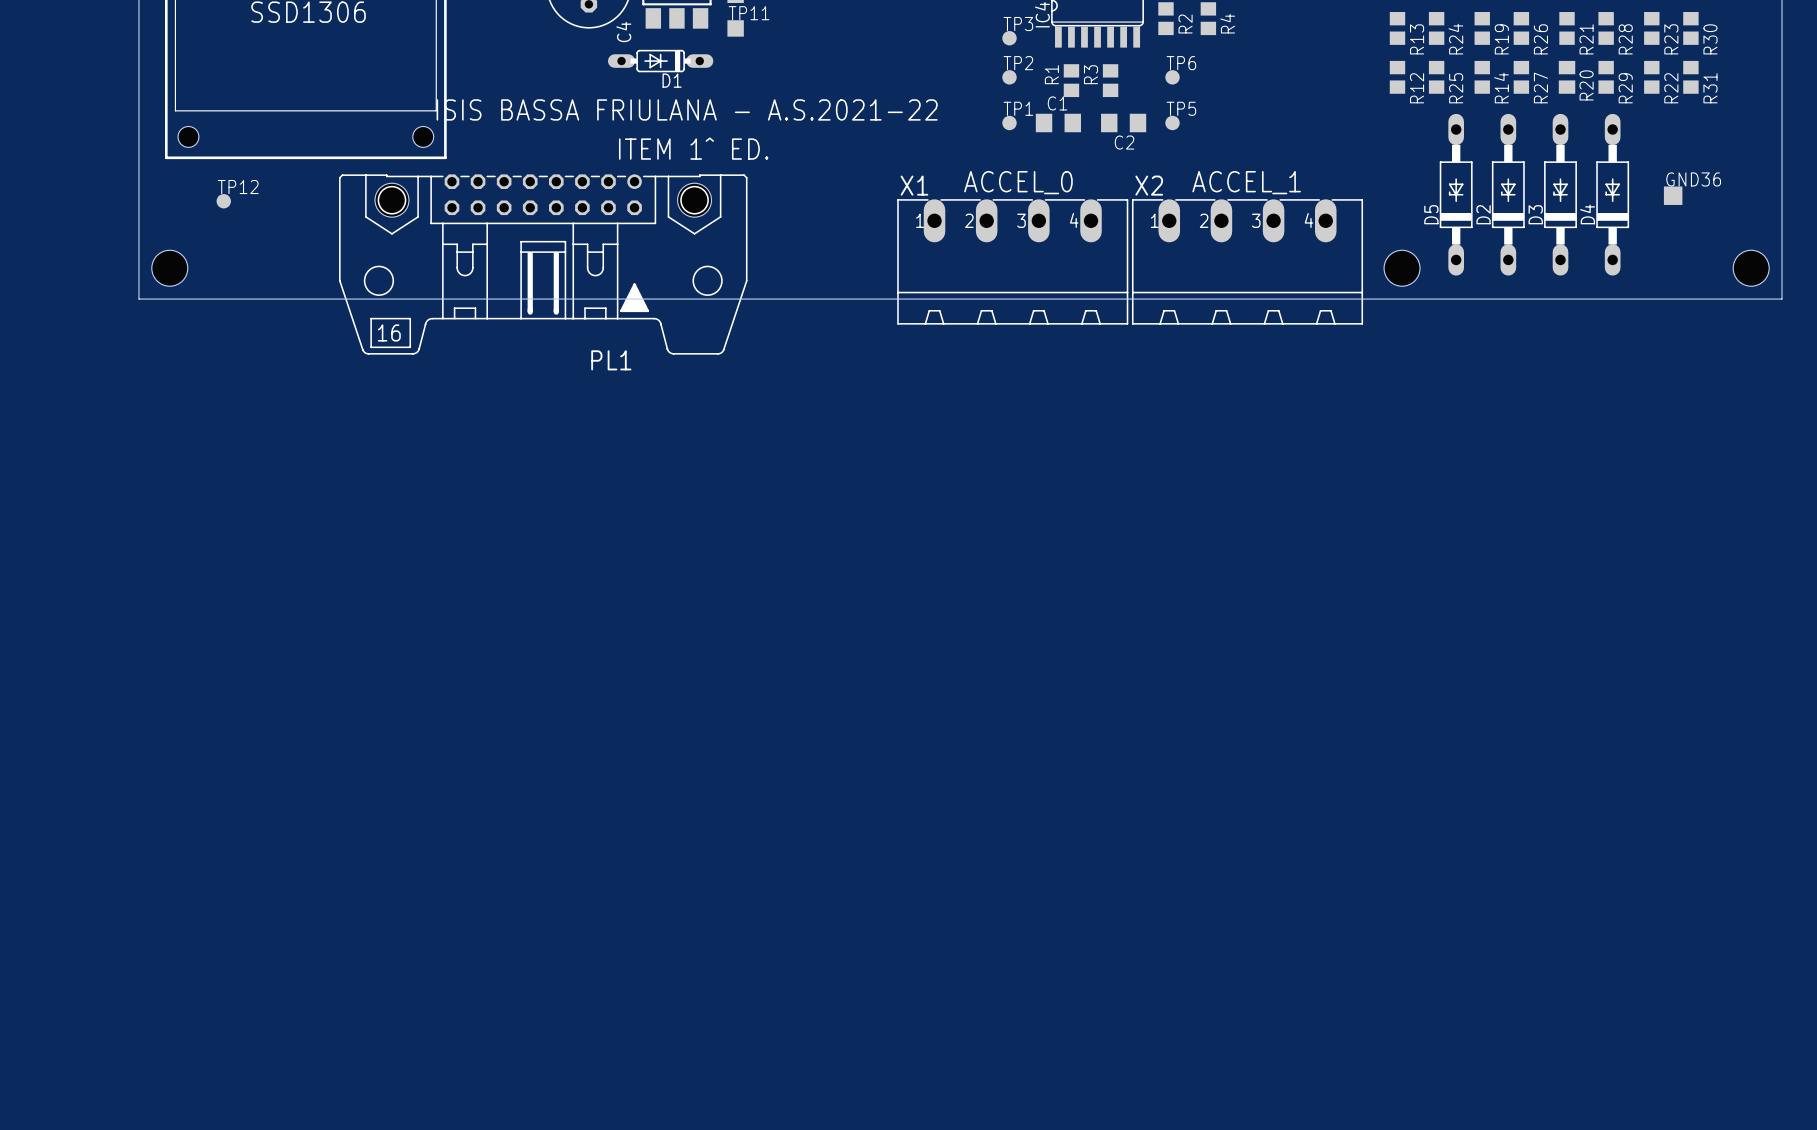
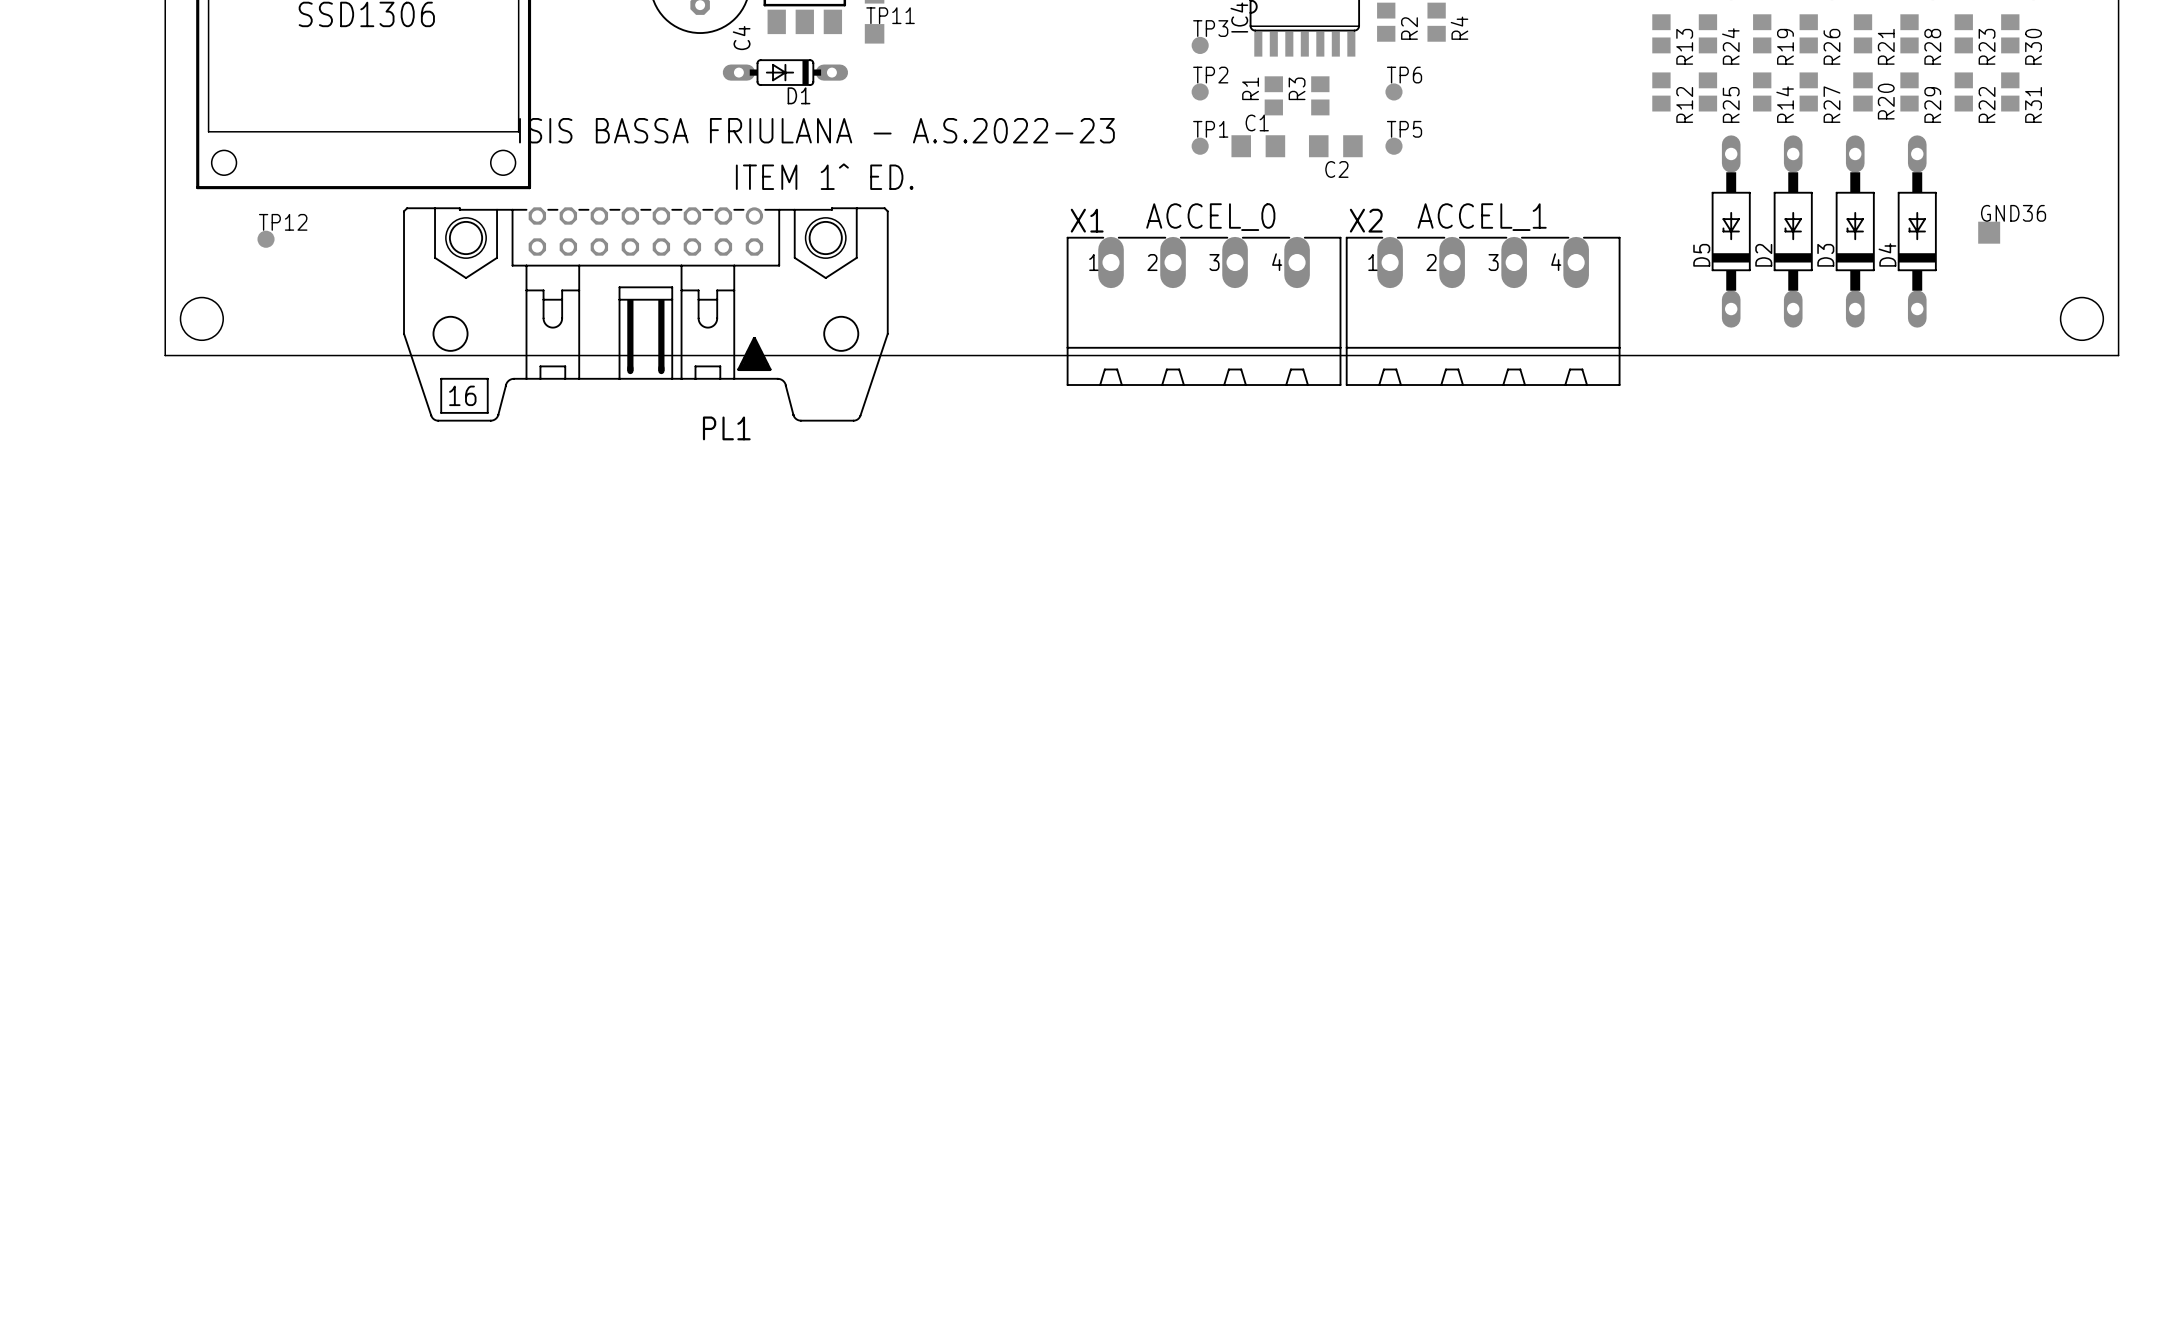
text: ISIS BASSA FRIULANA - A.S.2021-22 (687, 109) -> ISIS BASSA FRIULANA - A.S.2022-23 (816, 130)
hole: (1402, 268) -> none

